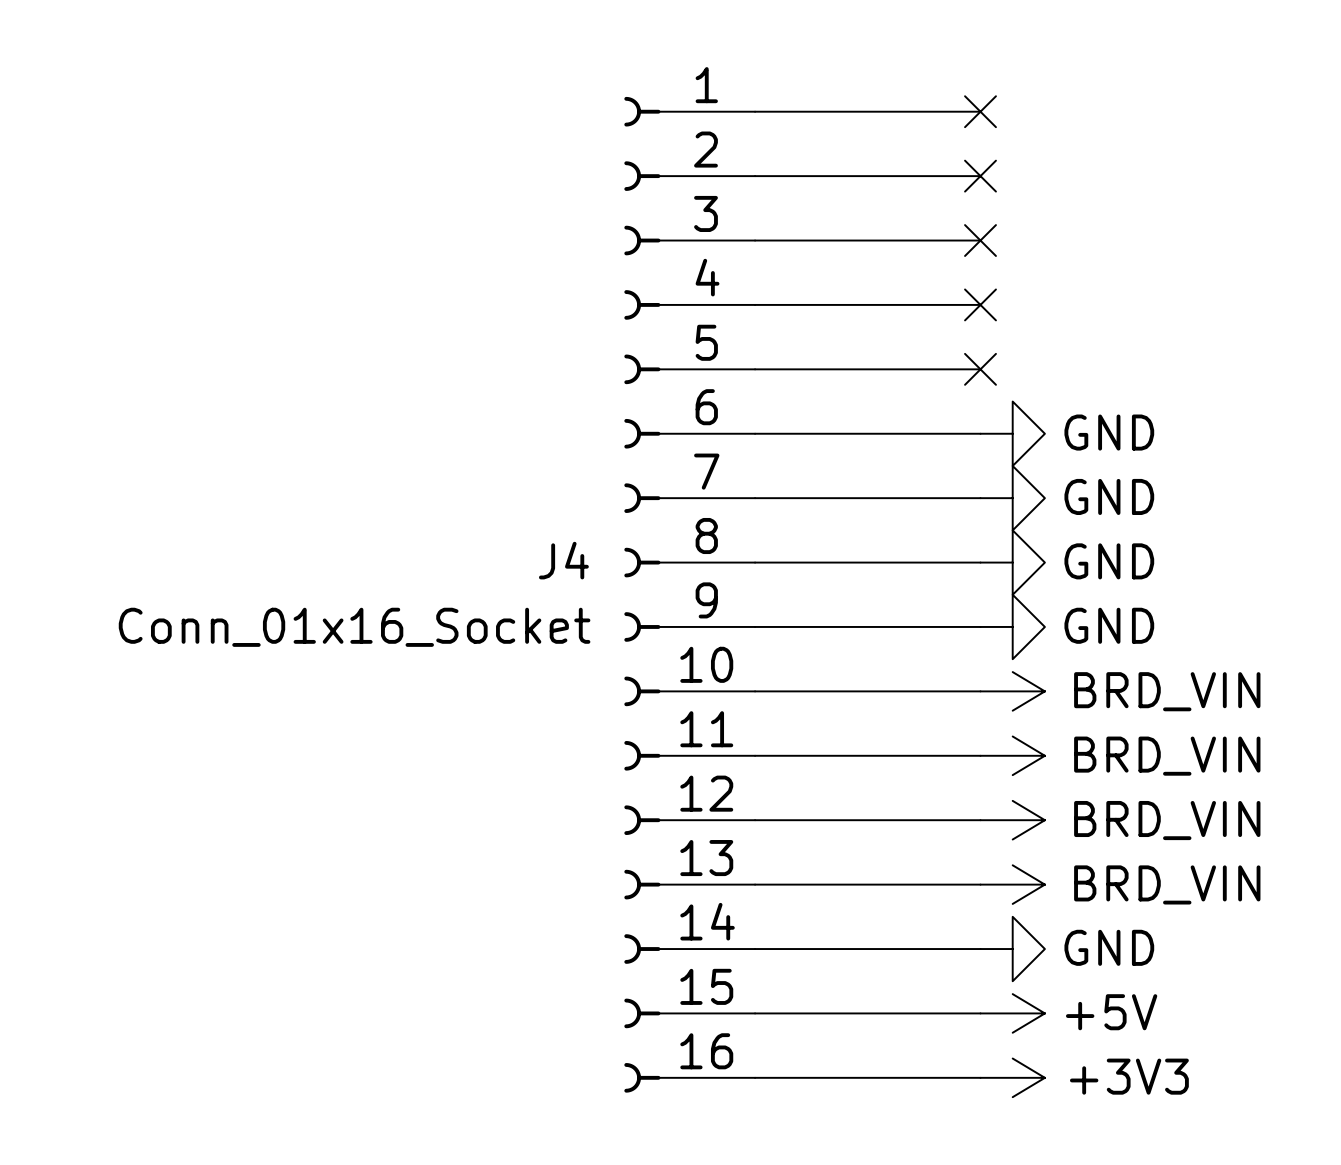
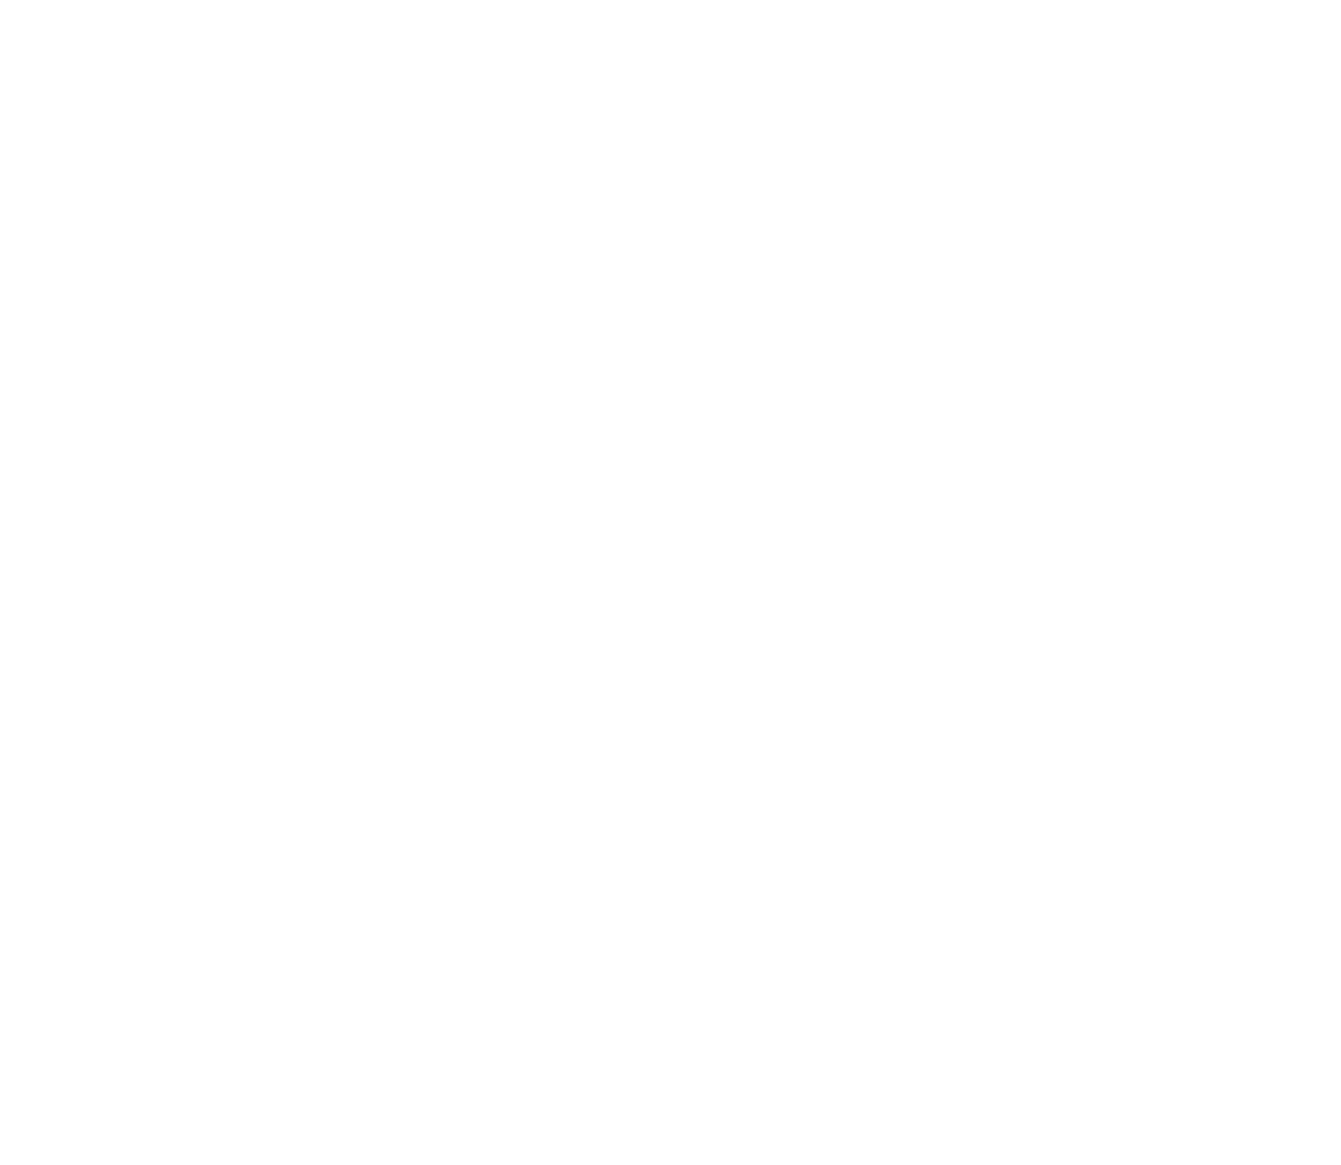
wire: (755, 111) (980, 111) -> none
no-connect mark: (980, 111) -> none
wire: (755, 176) (980, 176) -> none
no-connect mark: (980, 176) -> none
wire: (755, 240) (980, 240) -> none
no-connect mark: (980, 240) -> none
wire: (755, 304) (980, 304) -> none
no-connect mark: (980, 304) -> none
wire: (755, 369) (980, 369) -> none
no-connect mark: (980, 369) -> none
wire: (755, 433) (980, 433) -> none
power symbol: GND (1012, 433) -> none
wire: (755, 498) (980, 498) -> none
power symbol: GND (1012, 498) -> none
wire: (755, 562) (980, 562) -> none
power symbol: GND (1012, 562) -> none
J4: Conn_01x16_Socket (689, 594) -> none
wire: (755, 626) (980, 626) -> none
power symbol: GND (1012, 626) -> none
wire: (755, 691) (980, 691) -> none
power symbol: BRD_VIN (1012, 691) -> none
wire: (755, 755) (980, 755) -> none
power symbol: BRD_VIN (1012, 755) -> none
wire: (755, 820) (980, 820) -> none
power symbol: BRD_VIN (1012, 820) -> none
wire: (755, 884) (980, 884) -> none
power symbol: BRD_VIN (1012, 884) -> none
wire: (755, 949) (980, 949) -> none
power symbol: GND (1012, 949) -> none
wire: (755, 1013) (980, 1013) -> none
power symbol: +5V (1012, 1013) -> none
wire: (755, 1077) (980, 1077) -> none
power symbol: +3V3 (1012, 1077) -> none

